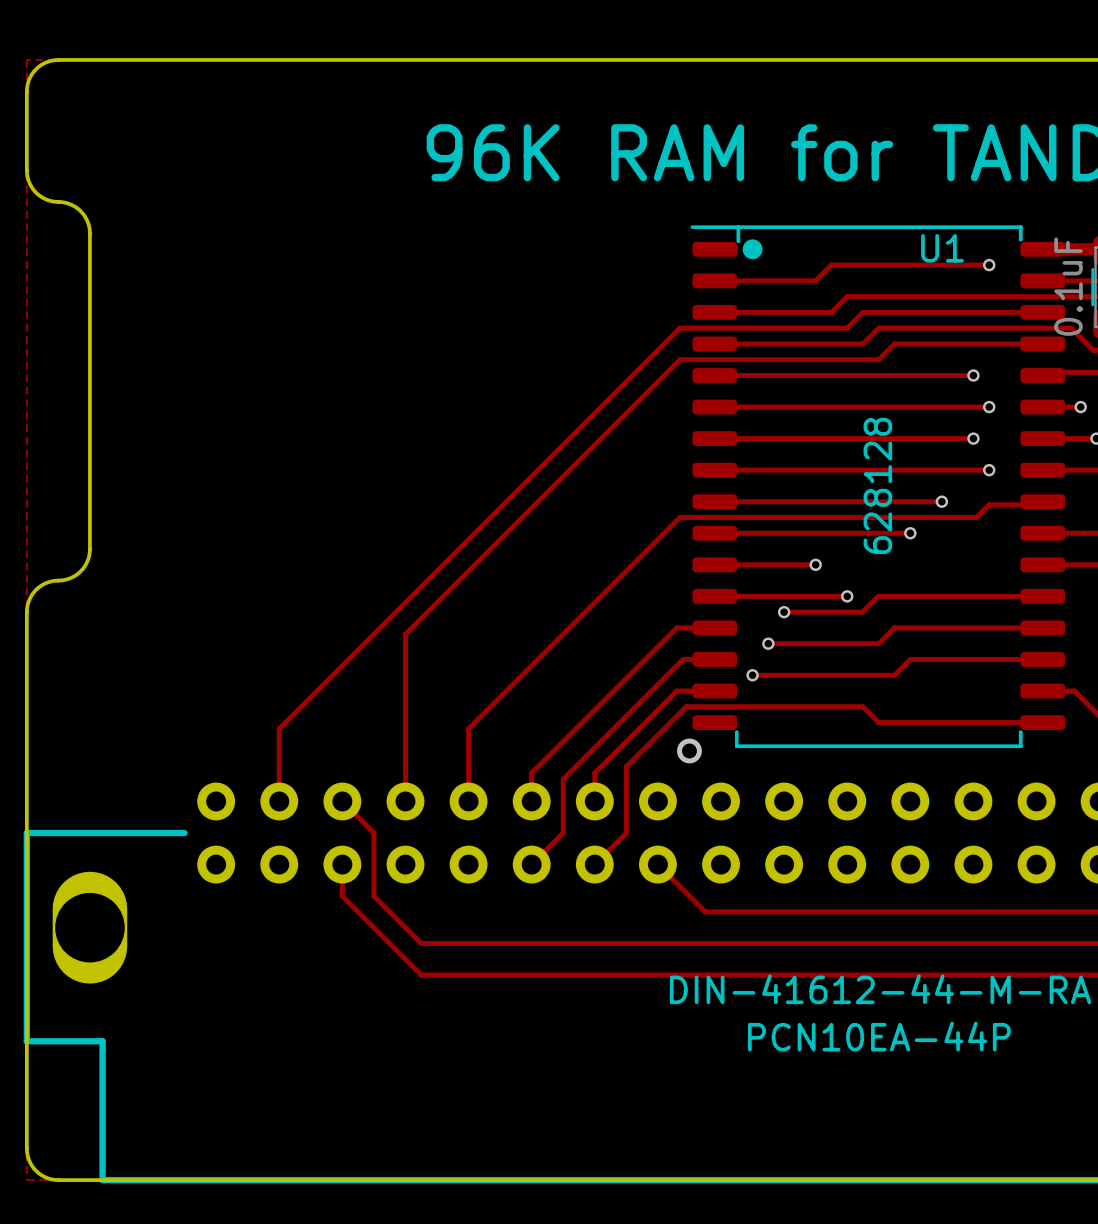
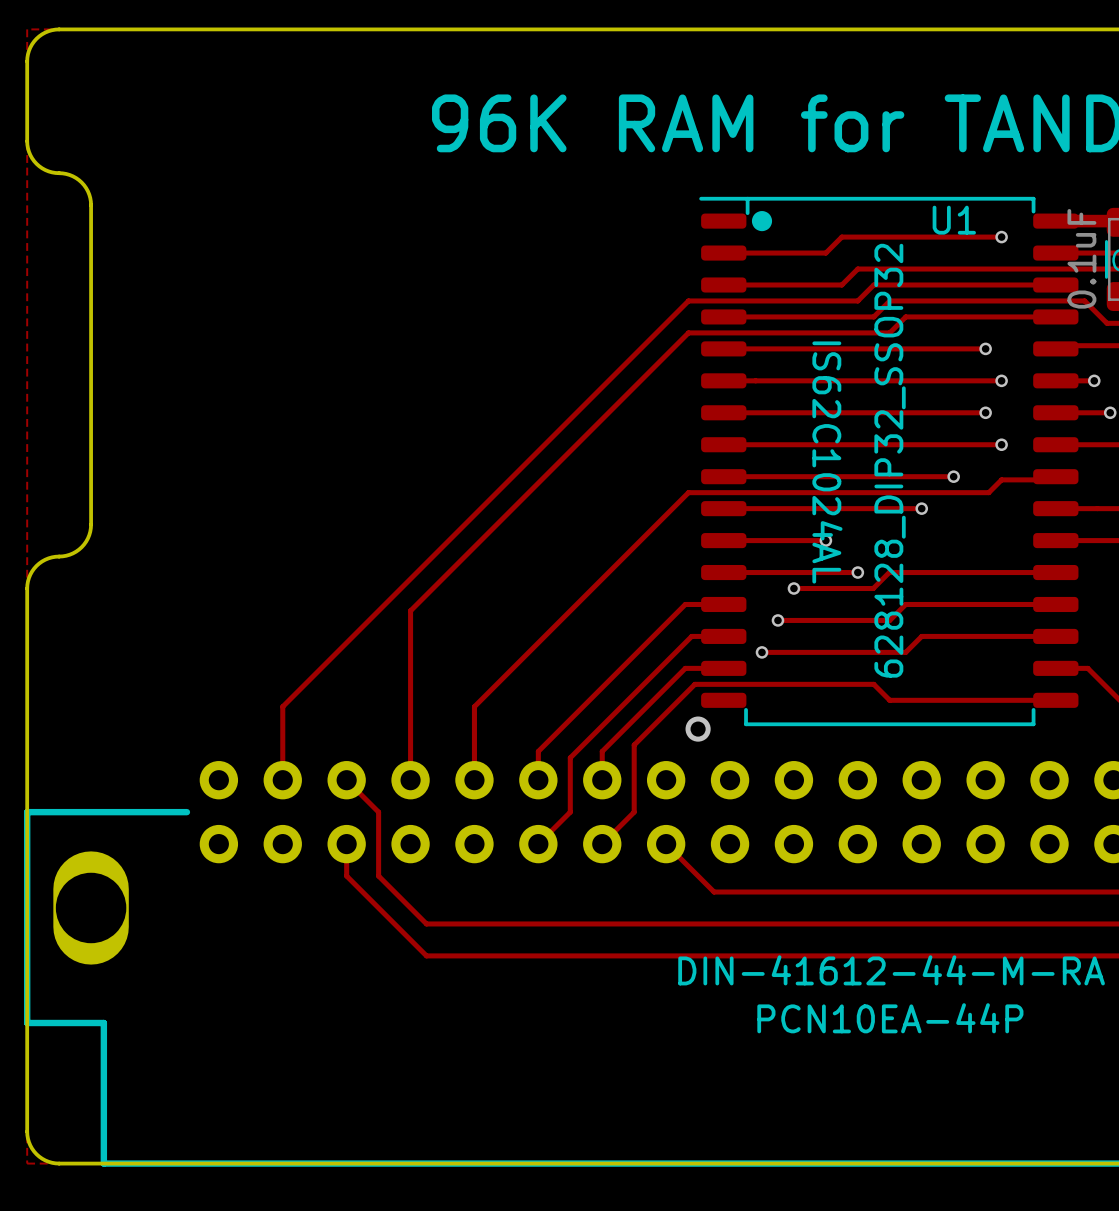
U1 value: 628128 (877, 485) -> 628128_DIP32_SSOP32 (890, 460)
text: none -> IS62C1024AL (827, 462)

